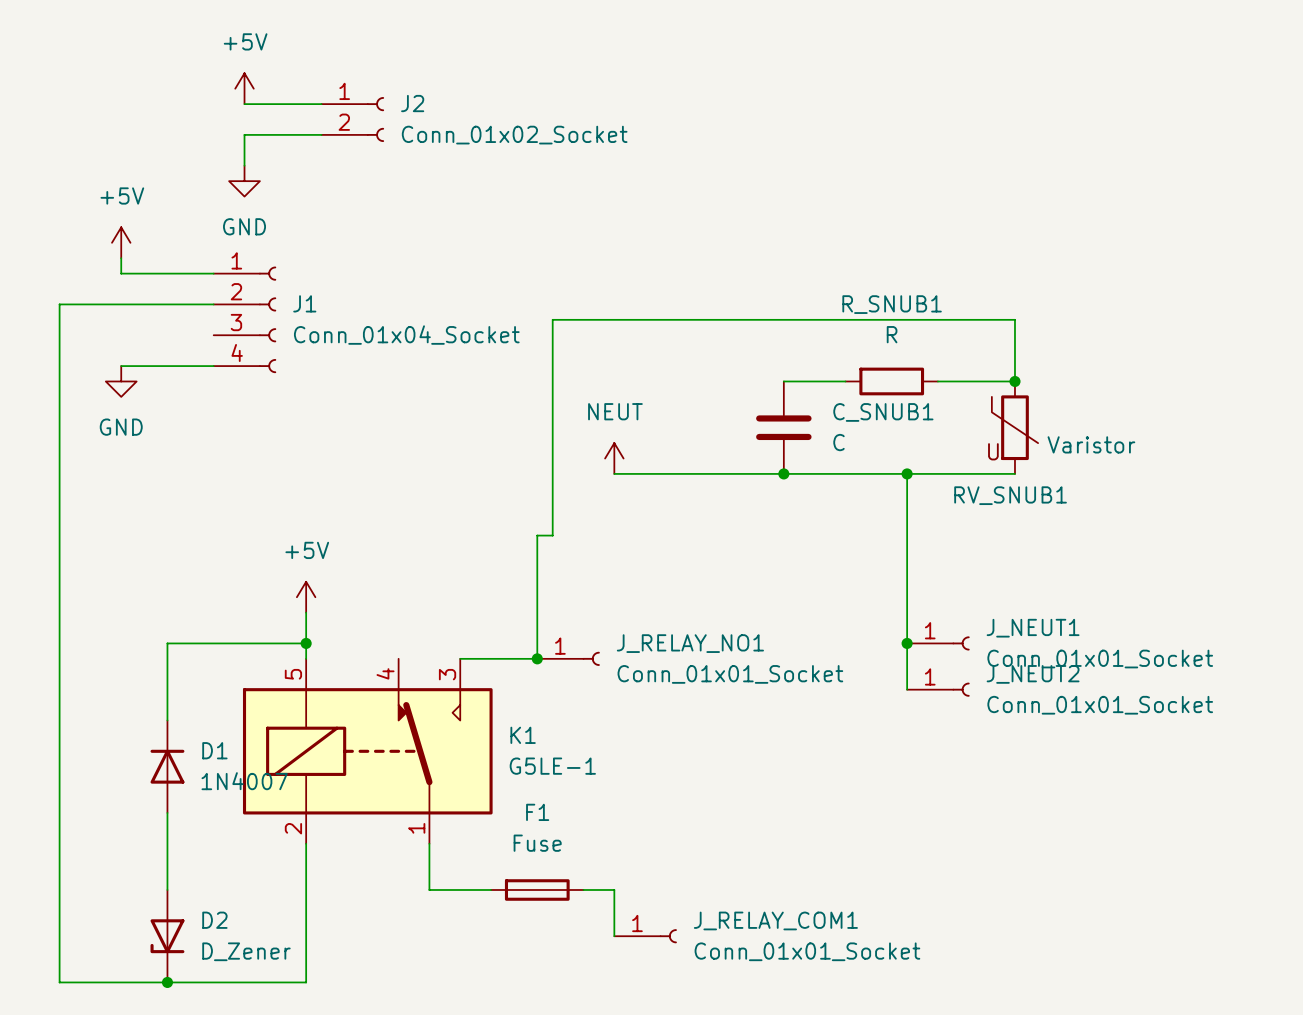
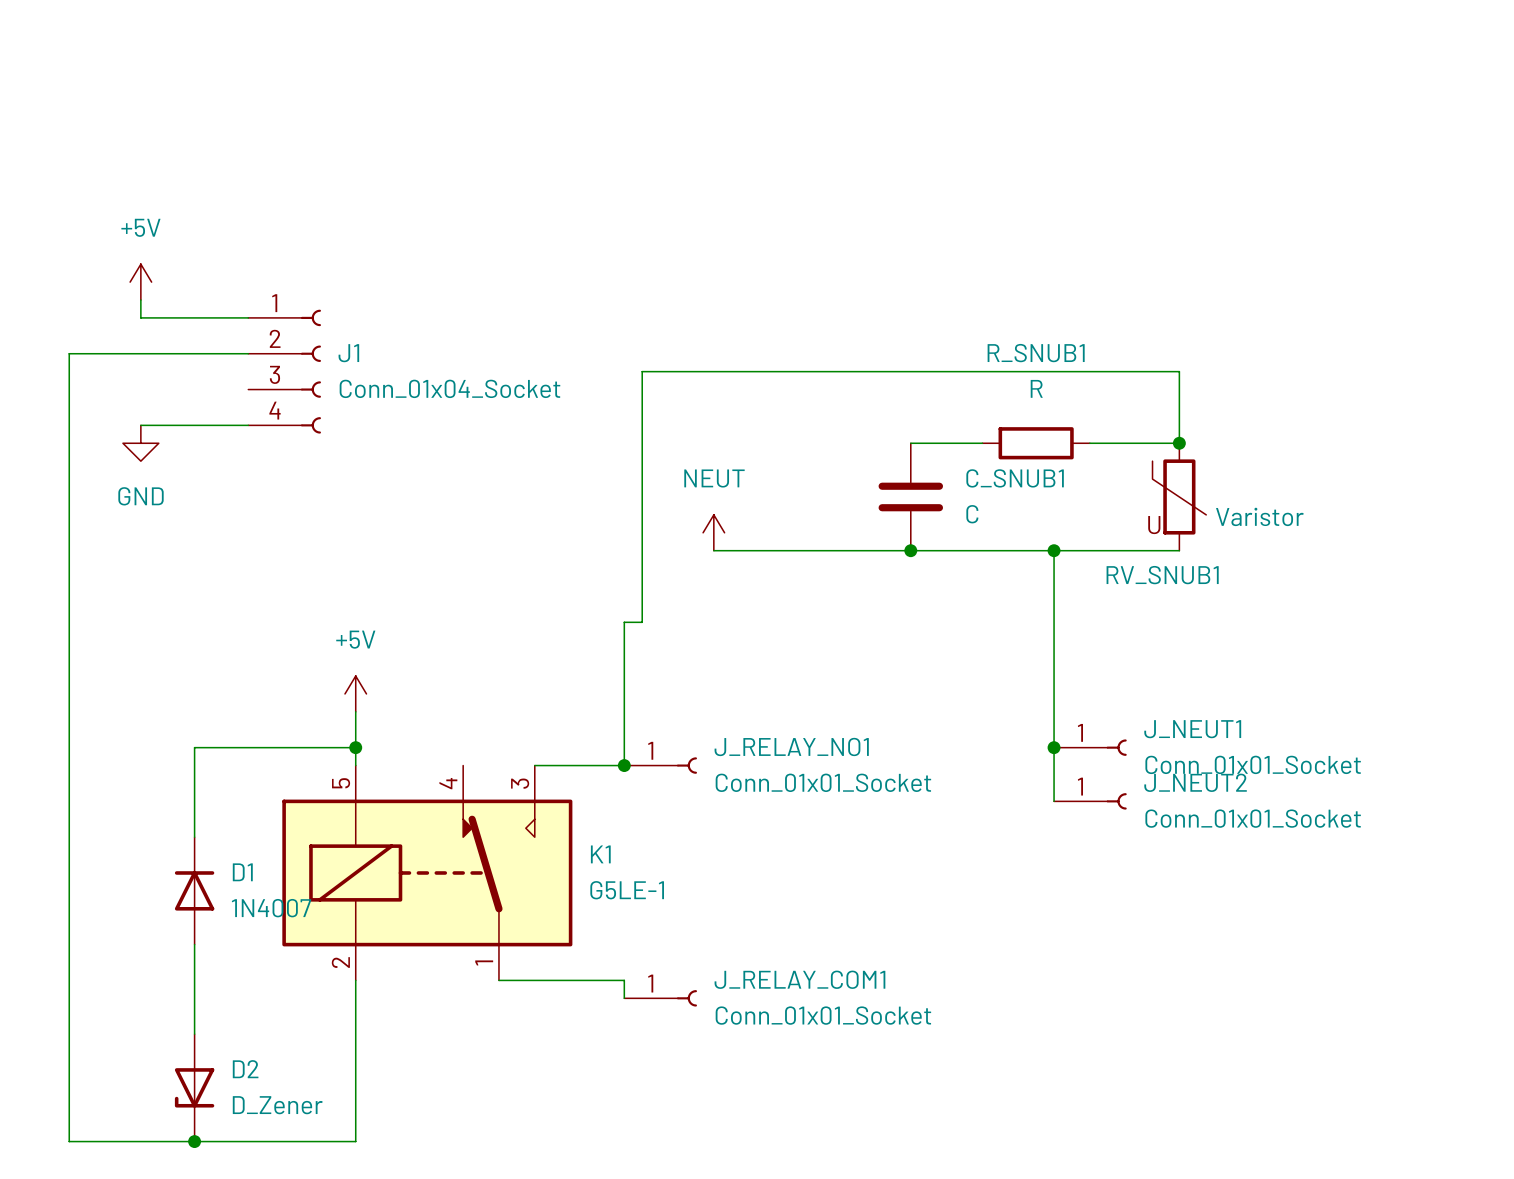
power symbol: +5V (244, 88) -> none
wire: (244, 104) (321, 104) -> none
J2: Conn_01x02_Socket (352, 119) -> none
wire: (321, 134) (244, 134) (244, 165) -> none
power symbol: GND (244, 181) -> none
wire: (429, 843) (429, 889) (491, 889) -> (498, 980) (624, 980) (624, 998)
F1: Fuse (537, 889) -> none
wire: (583, 889) (614, 889) (614, 936) -> none
J_RELAY_COM1 position: (645, 936) -> (660, 998)

